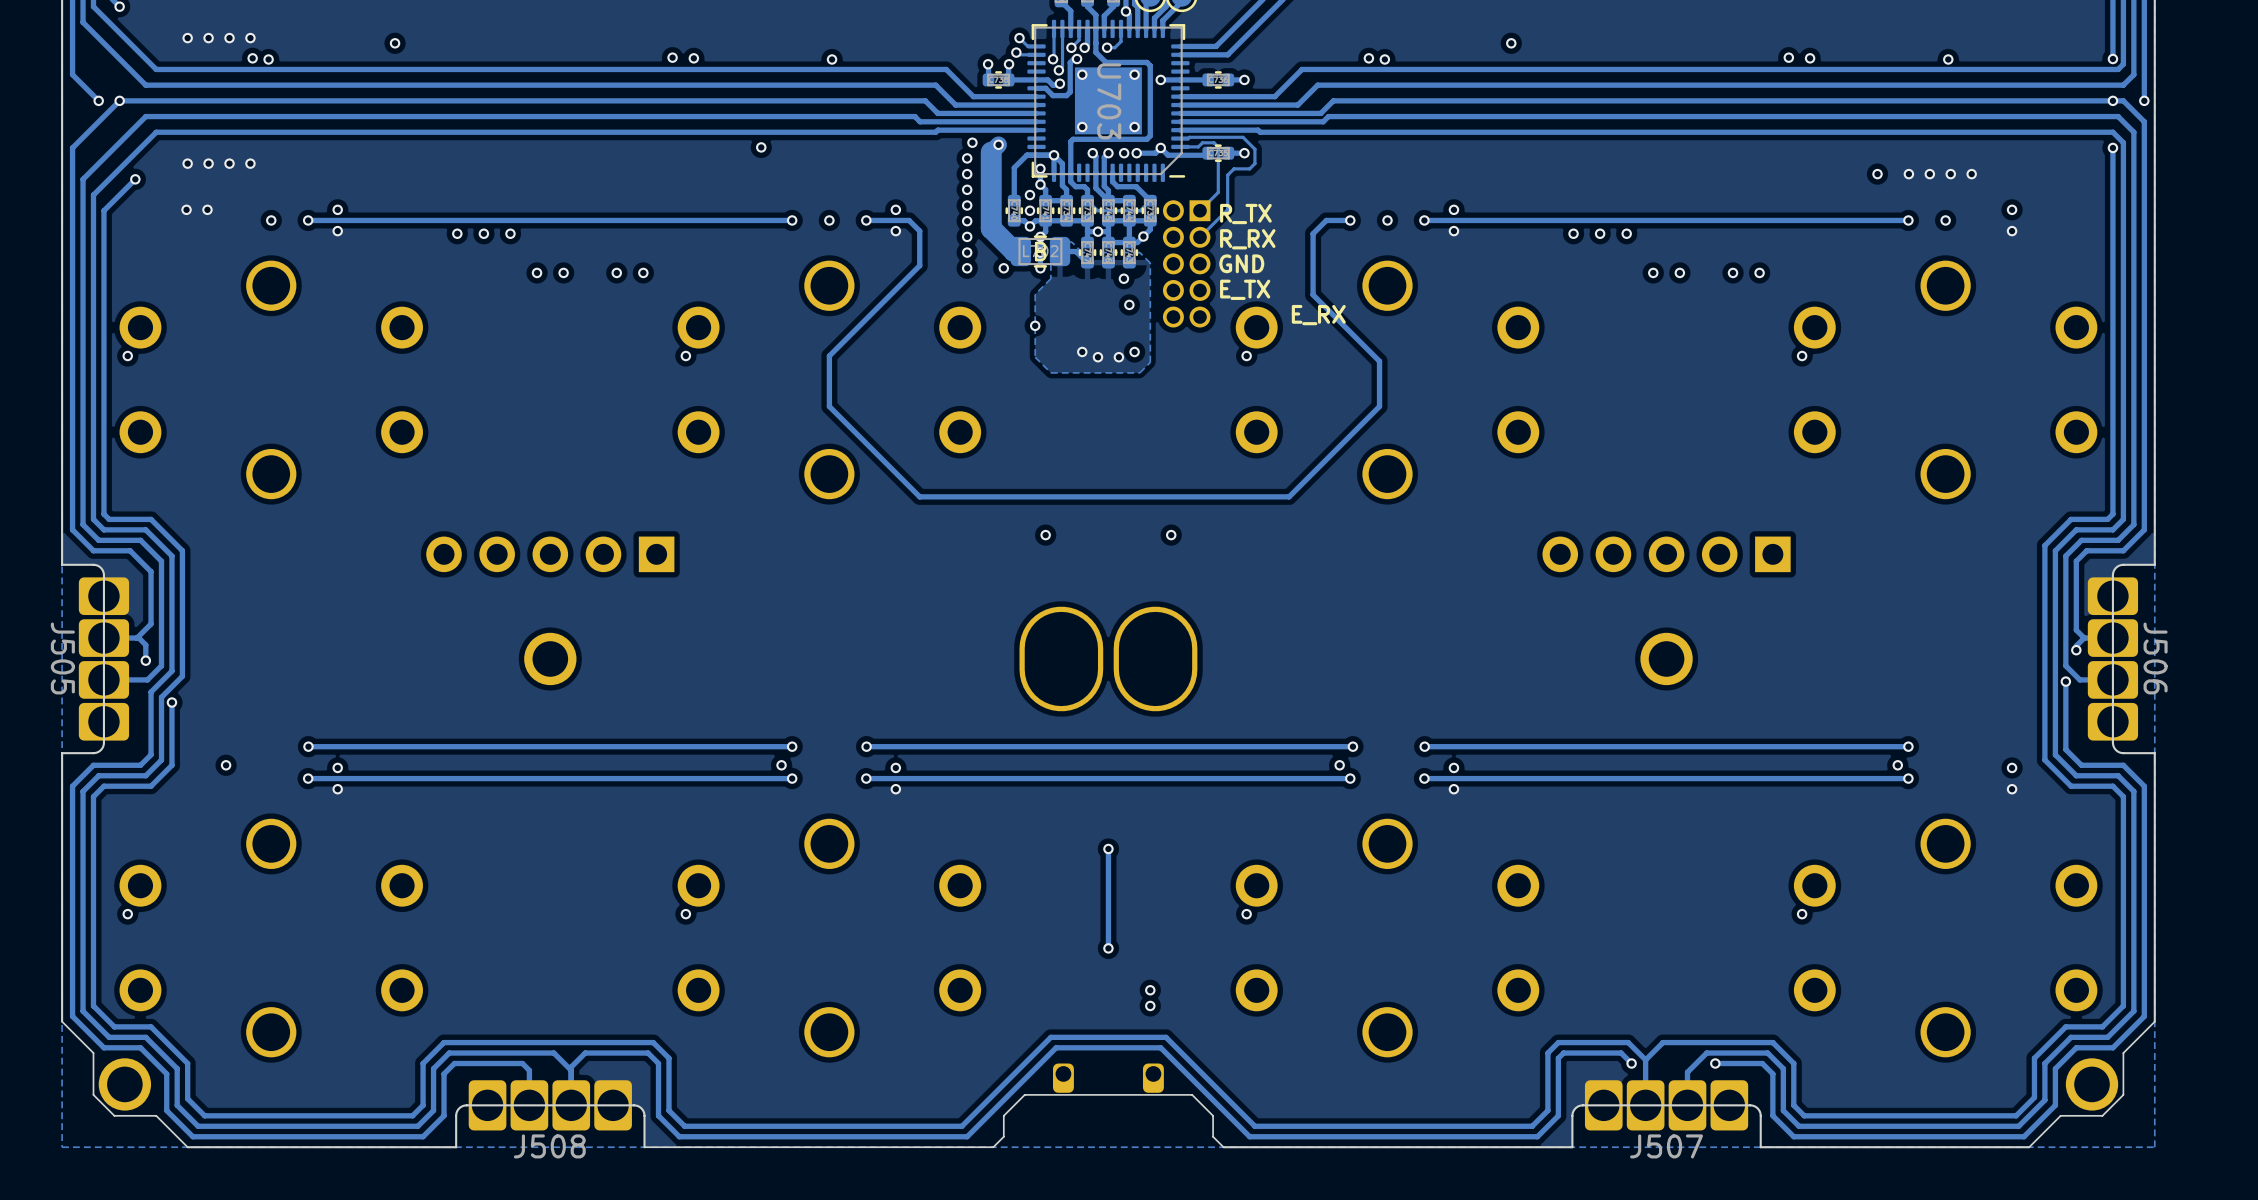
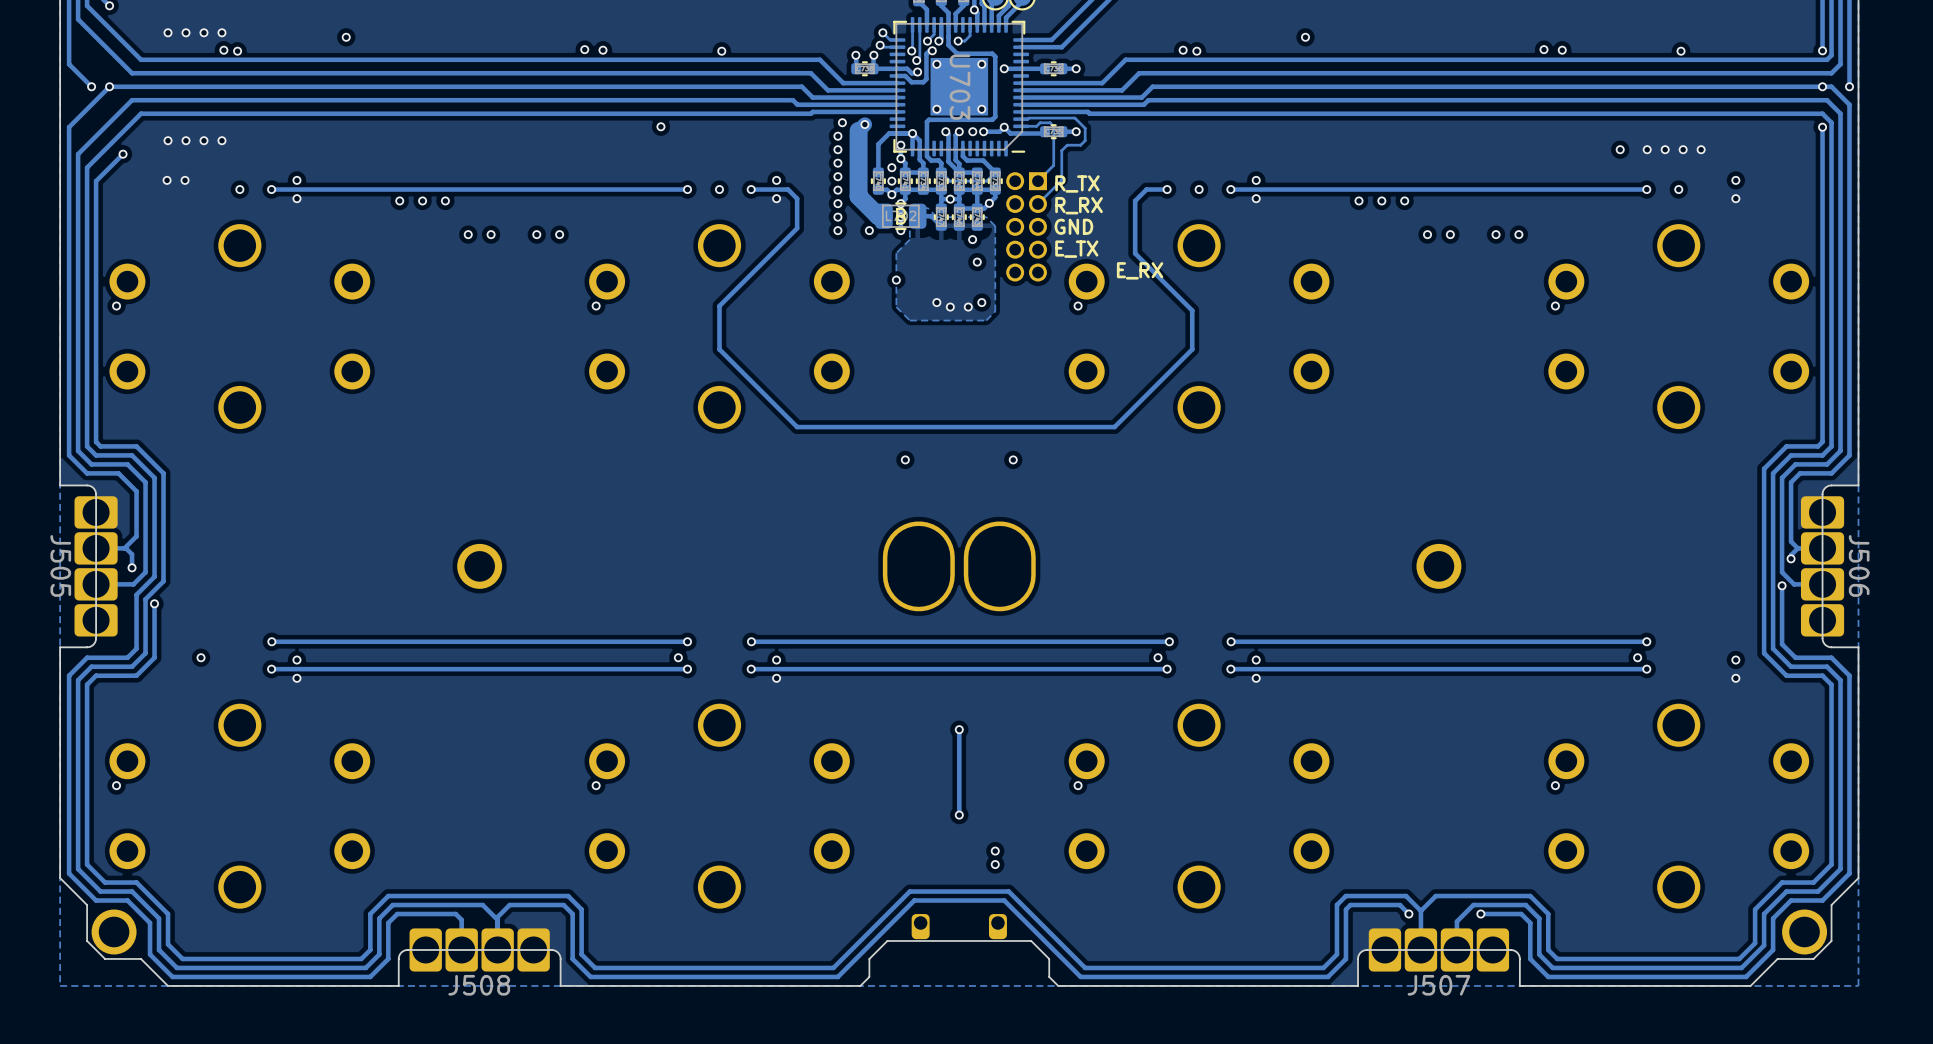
part: (550, 554) -> none
part: (1666, 554) -> none

